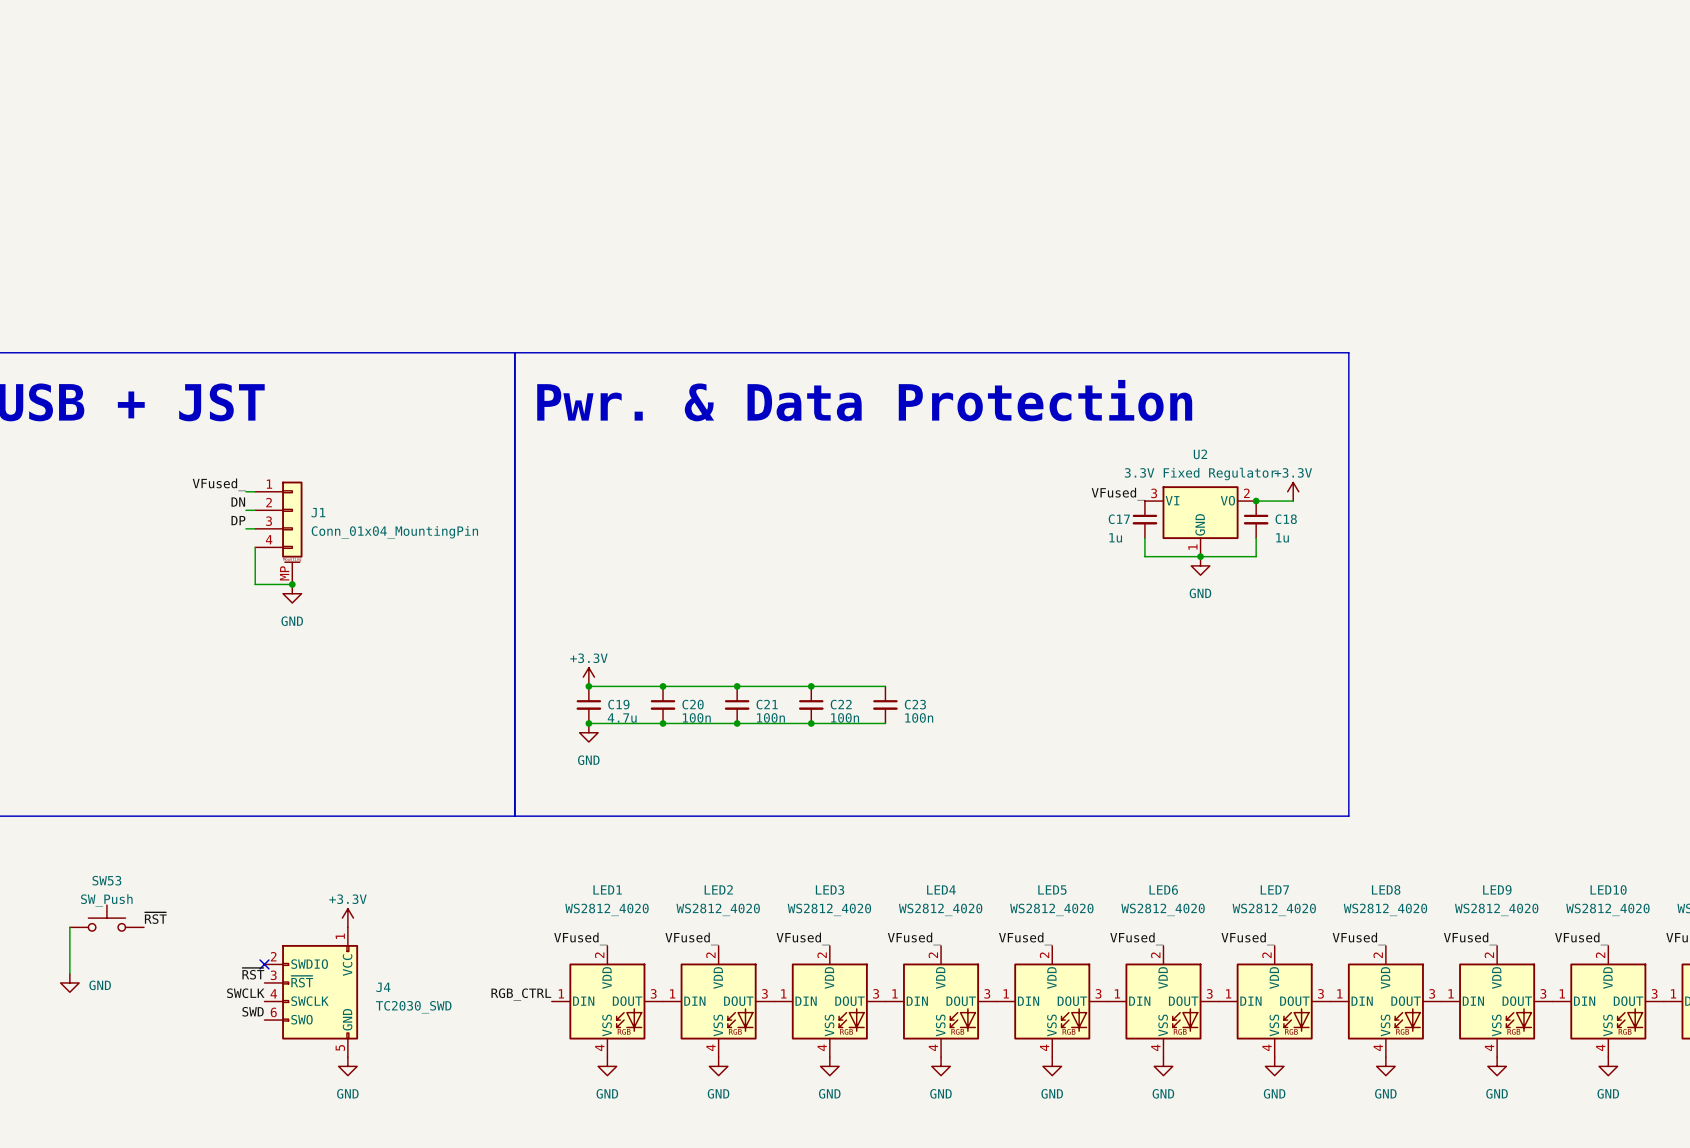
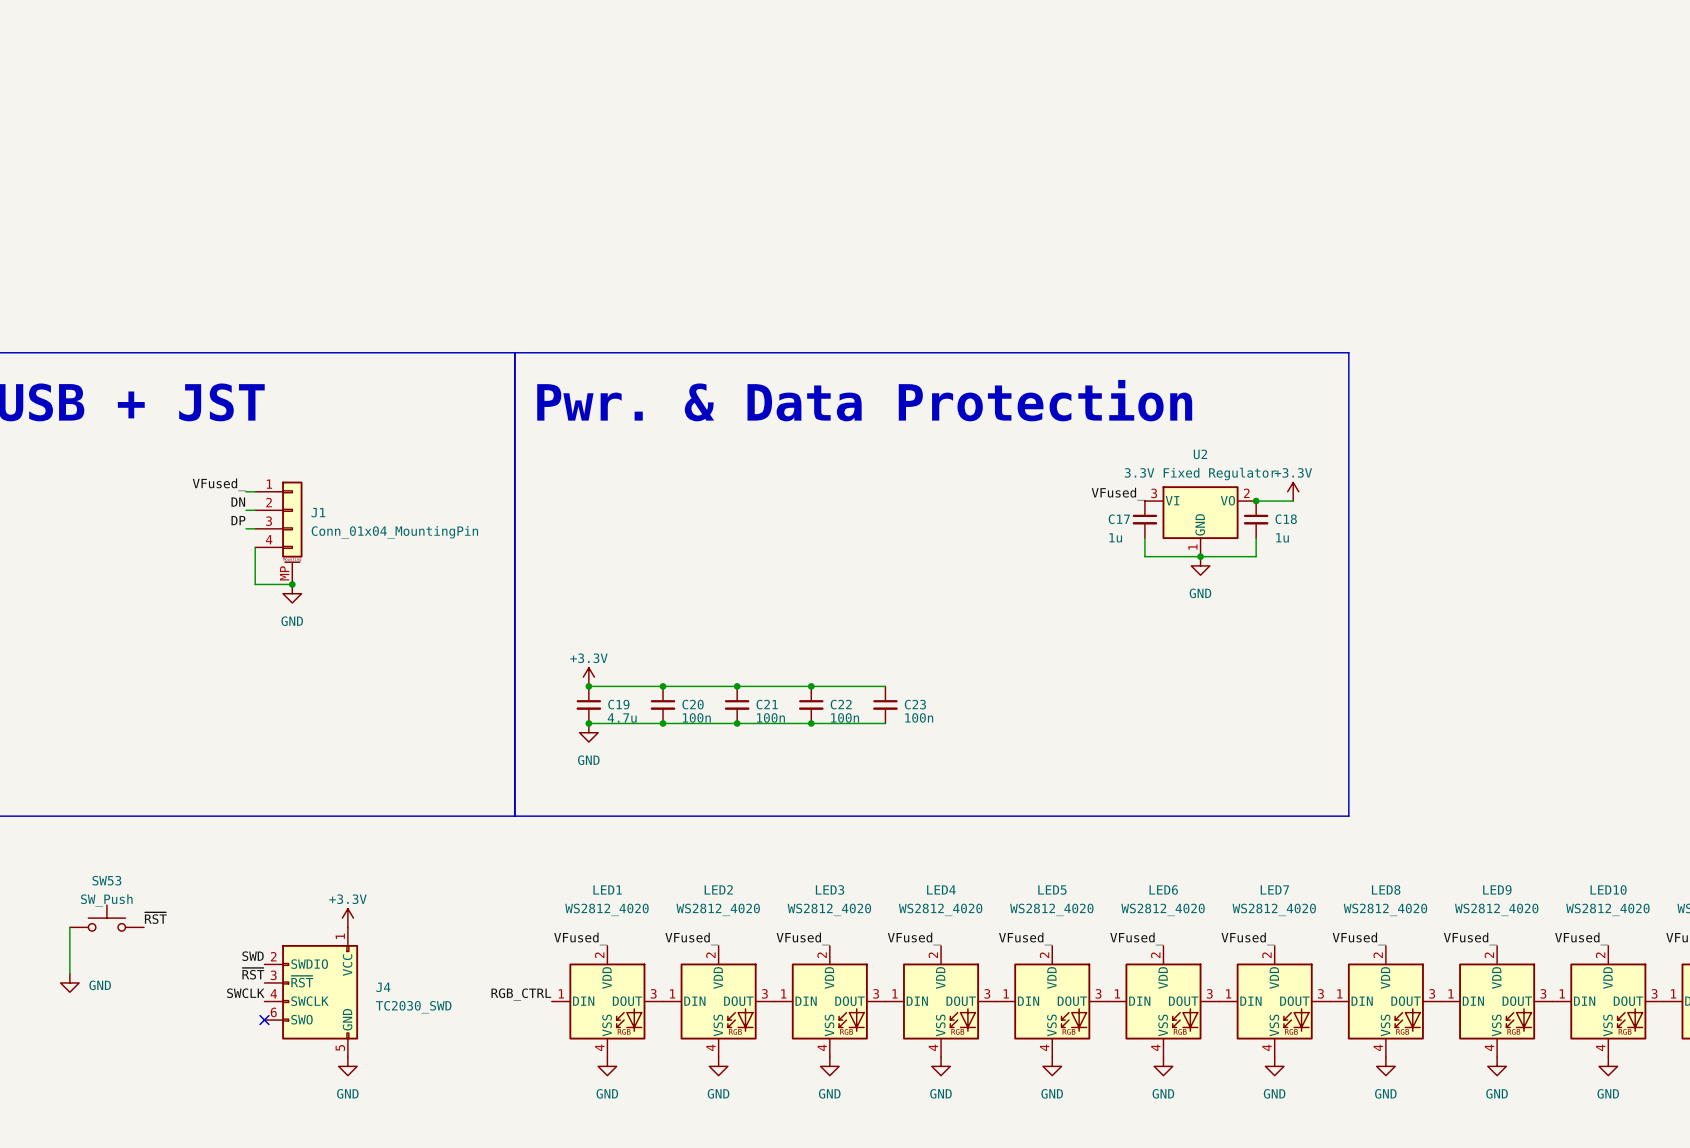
no-connect mark: (264, 964) -> none
label position: SWD (253, 1011) -> SWD (253, 956)
no-connect mark: none -> (264, 1020)

